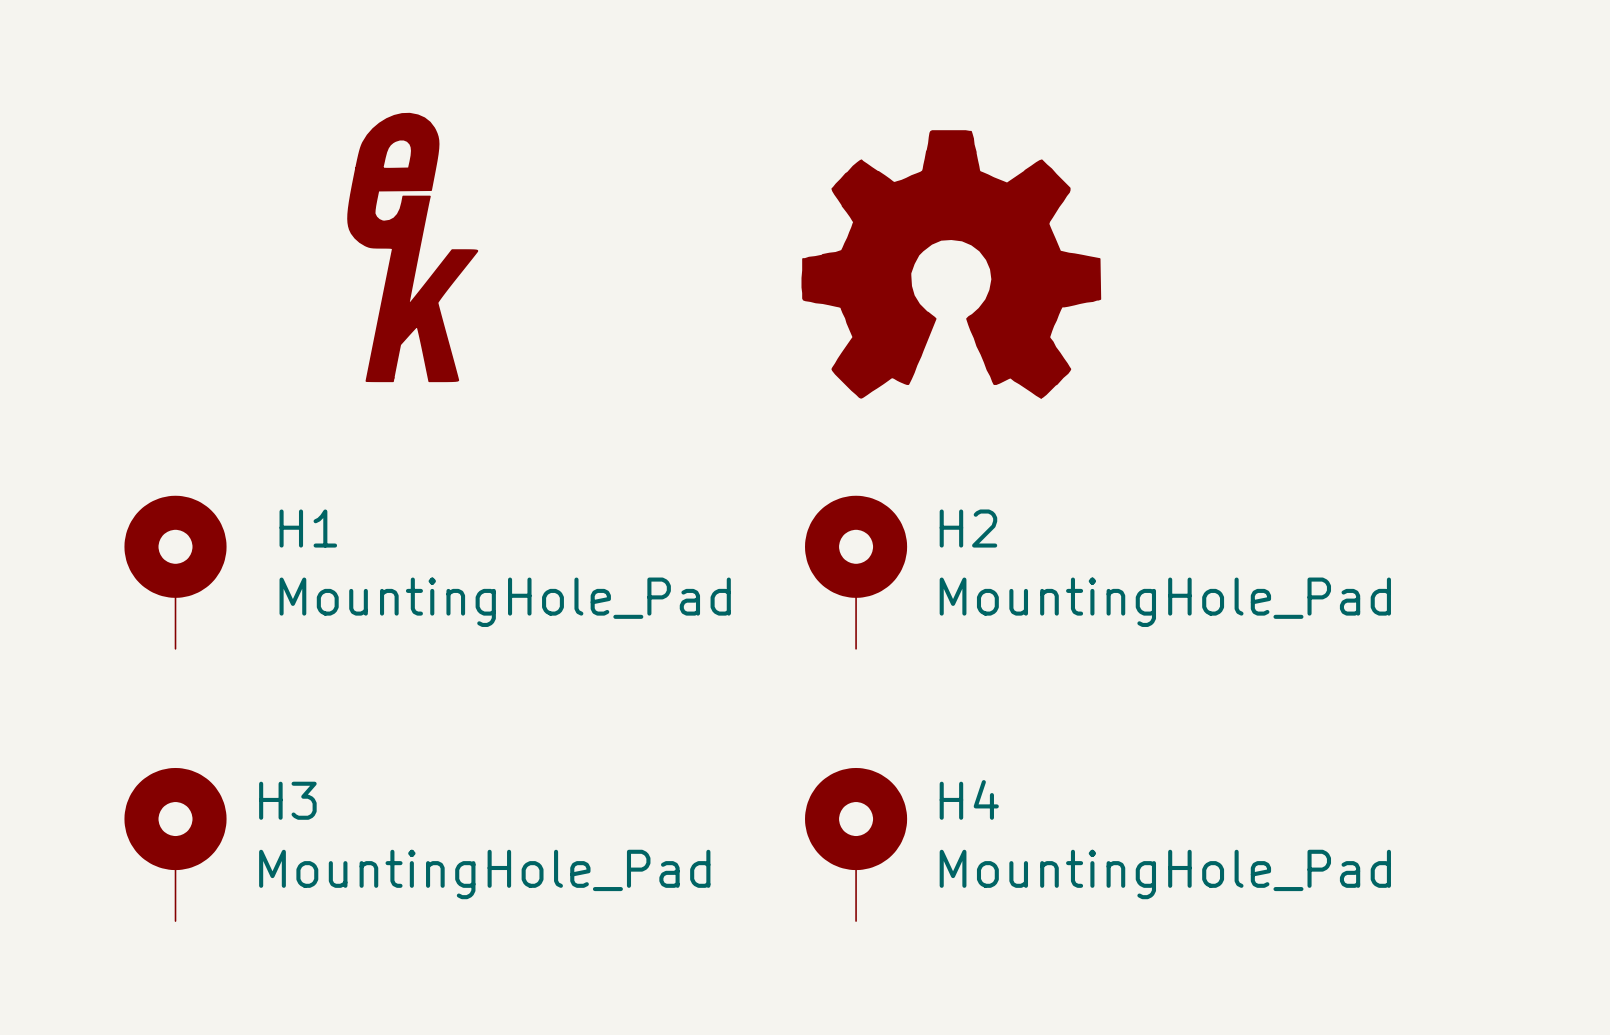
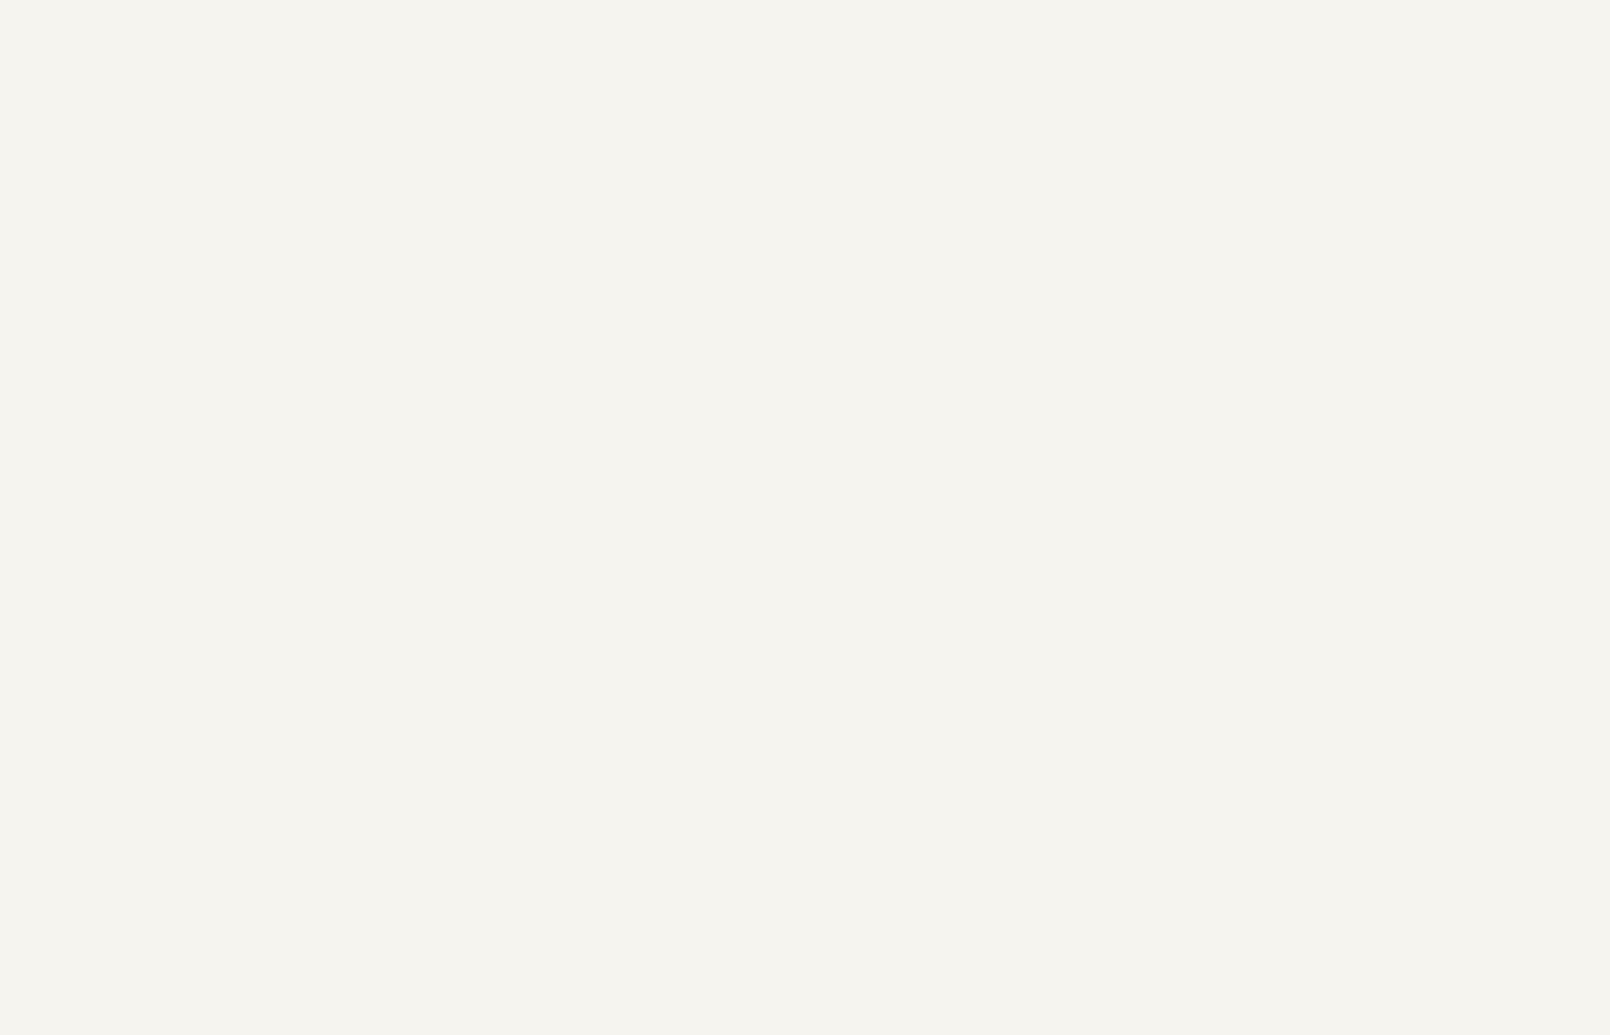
power symbol: (412, 247) -> none
power symbol: (951, 264) -> none
H1: MountingHole_Pad (175, 572) -> none
H2: MountingHole_Pad (856, 572) -> none
H3: MountingHole_Pad (175, 844) -> none
H4: MountingHole_Pad (856, 844) -> none

